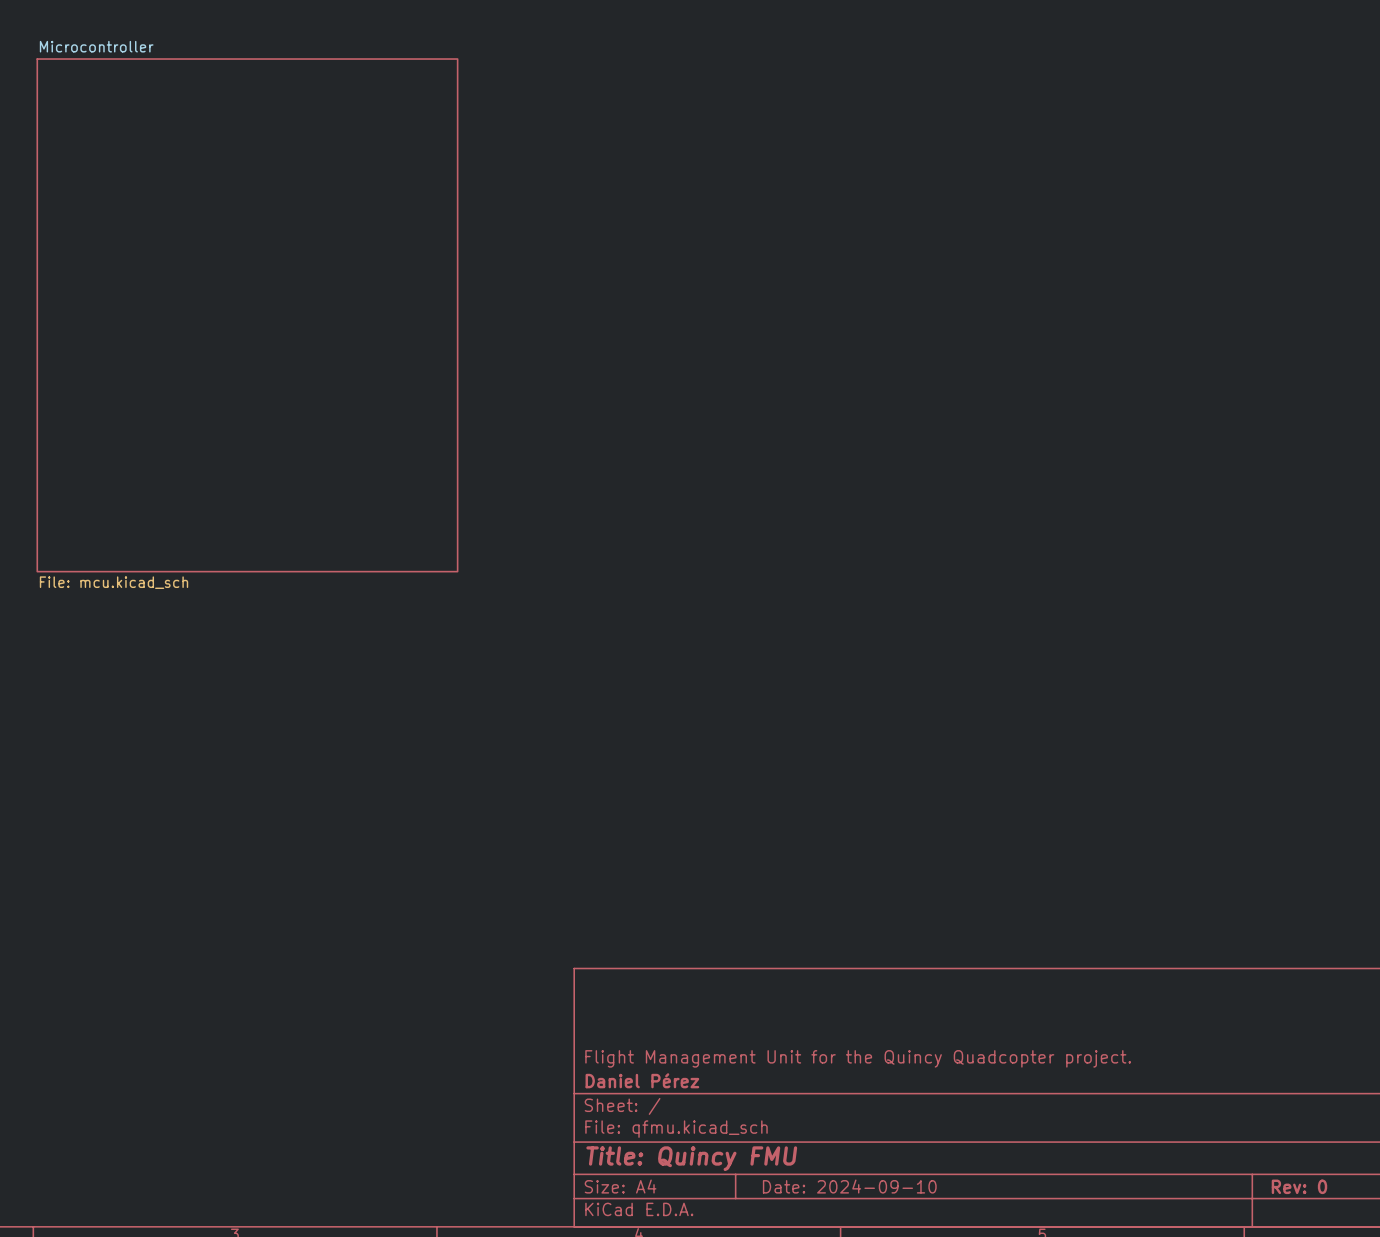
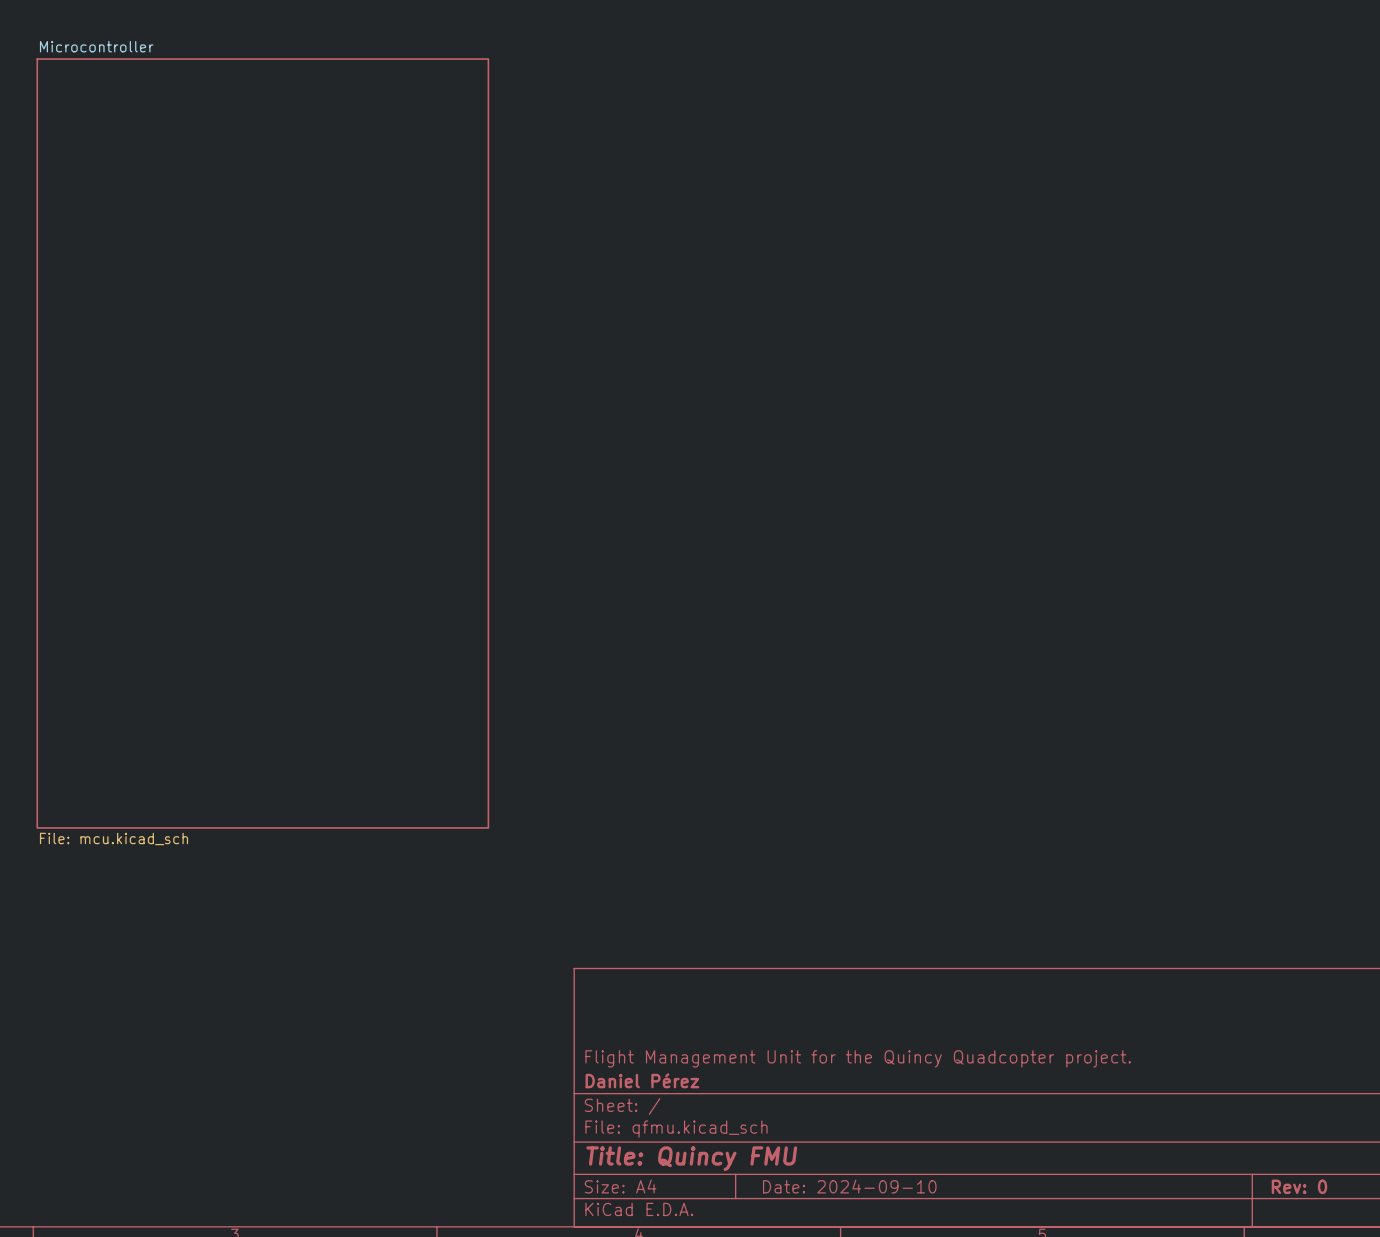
sheet Microcontroller: File: mcu.kicad_sch (247, 315) -> none
sheet Microcontroller: none -> File: mcu.kicad_sch (262, 443)

